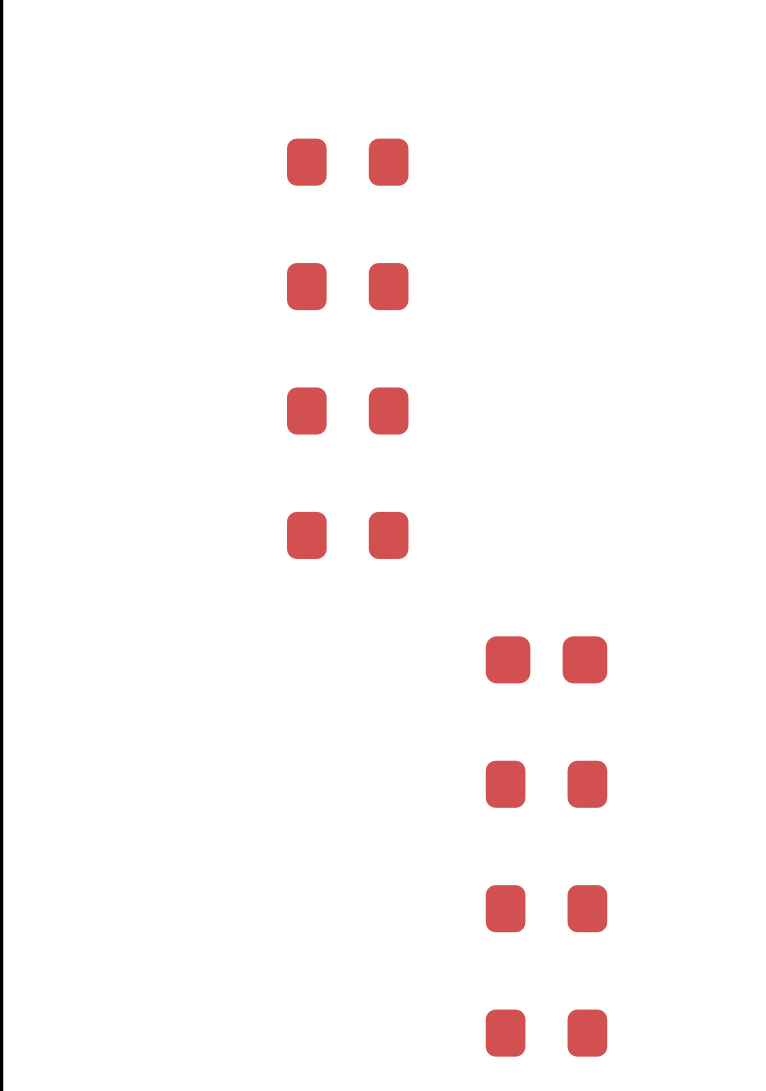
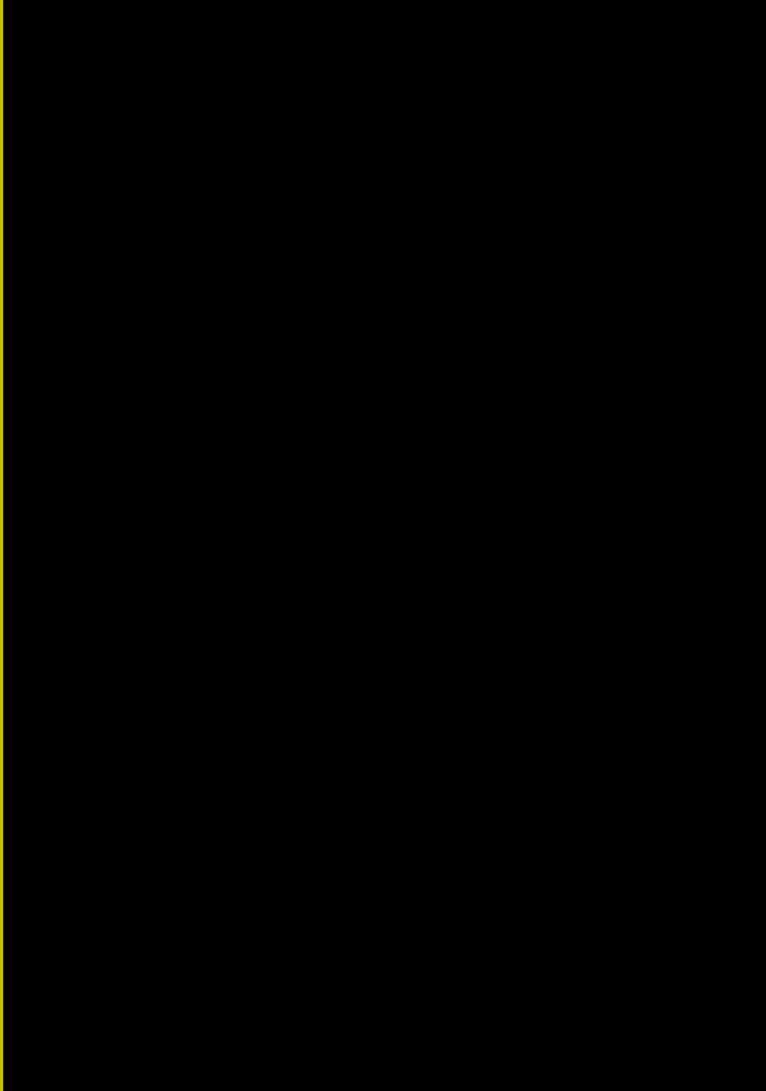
part: (347, 162) -> none
part: (347, 286) -> none
part: (347, 411) -> none
part: (347, 535) -> none
part: (546, 659) -> none
part: (546, 784) -> none
part: (546, 908) -> none
part: (546, 1033) -> none

